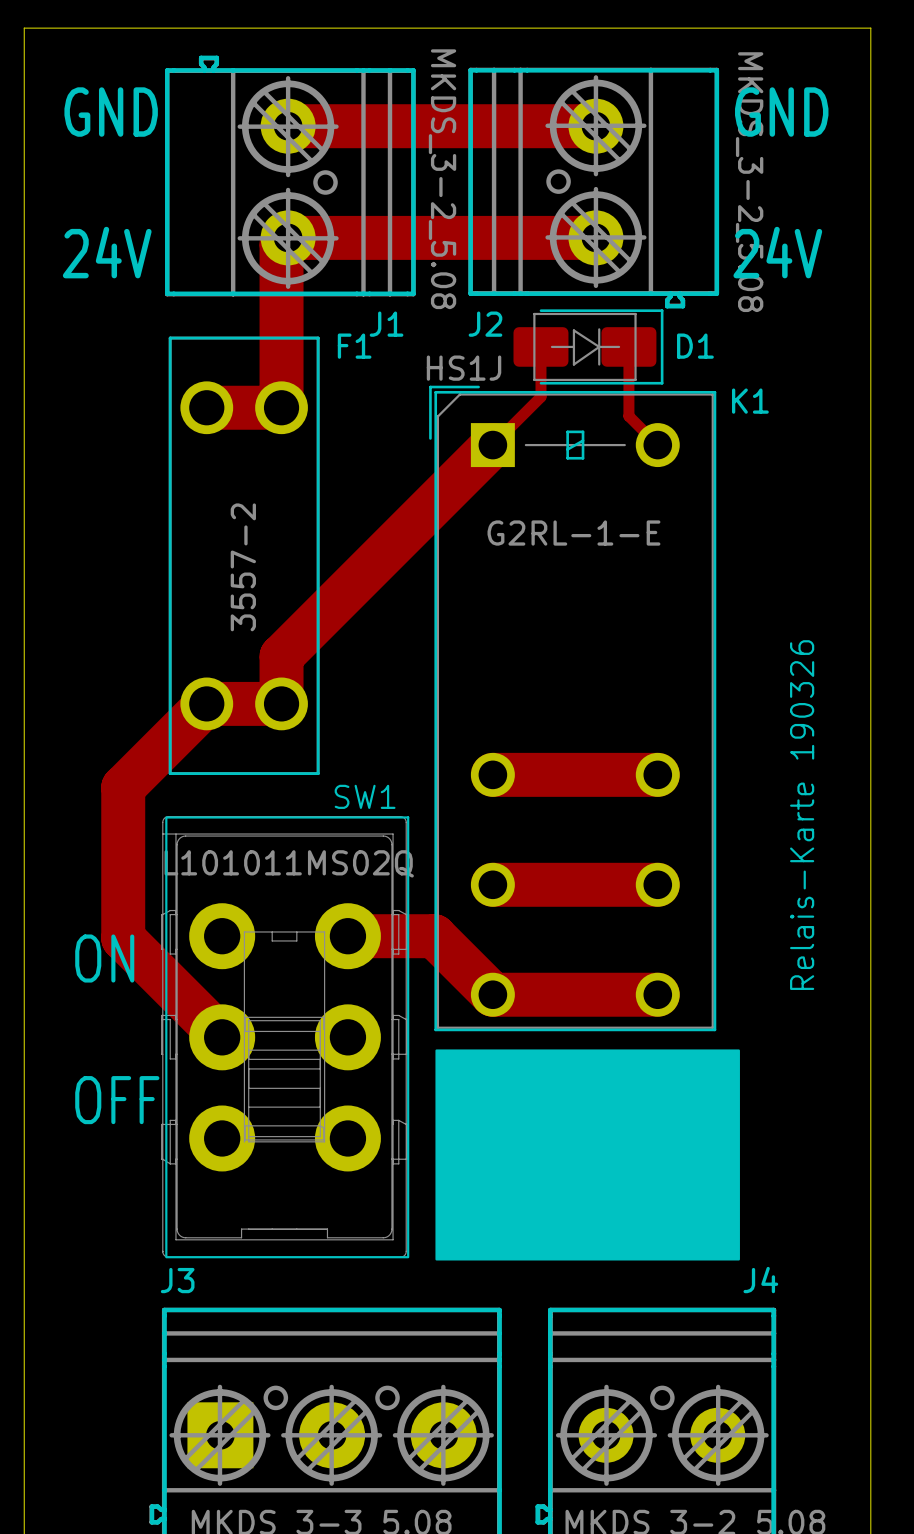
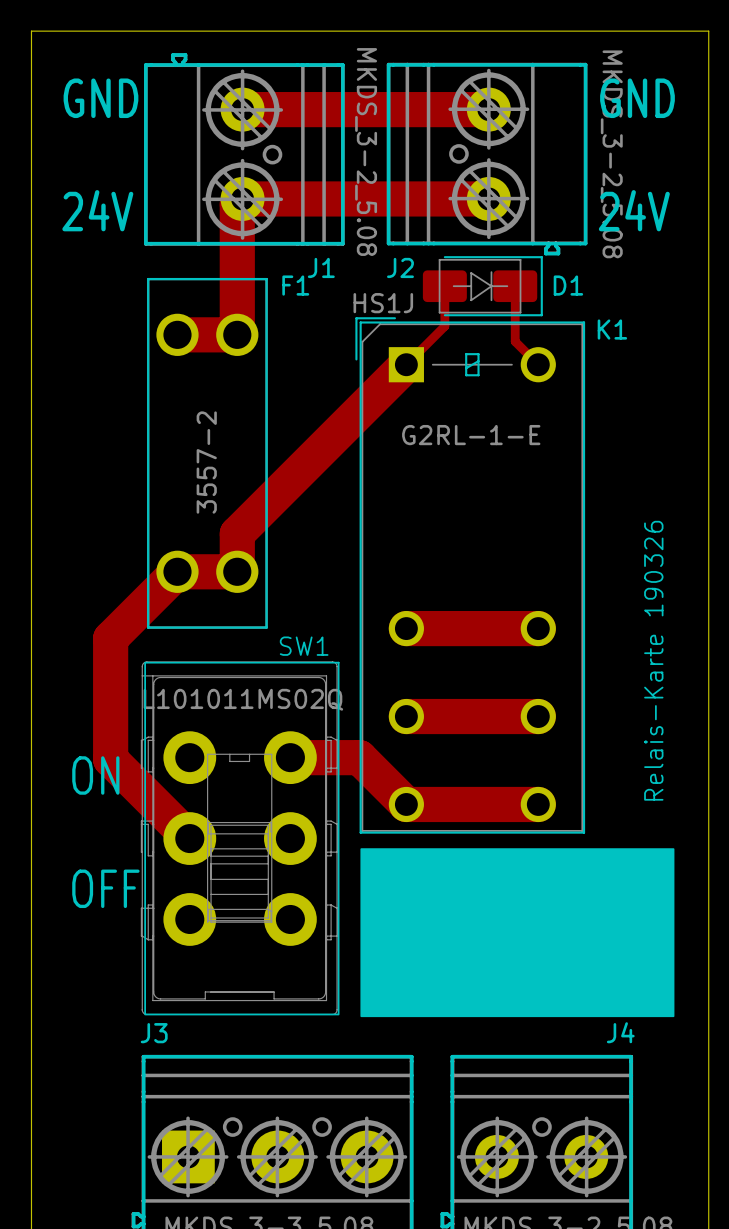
drawing: [435, 1049, 740, 1261] -> none
drawing: none -> [360, 848, 675, 1018]

